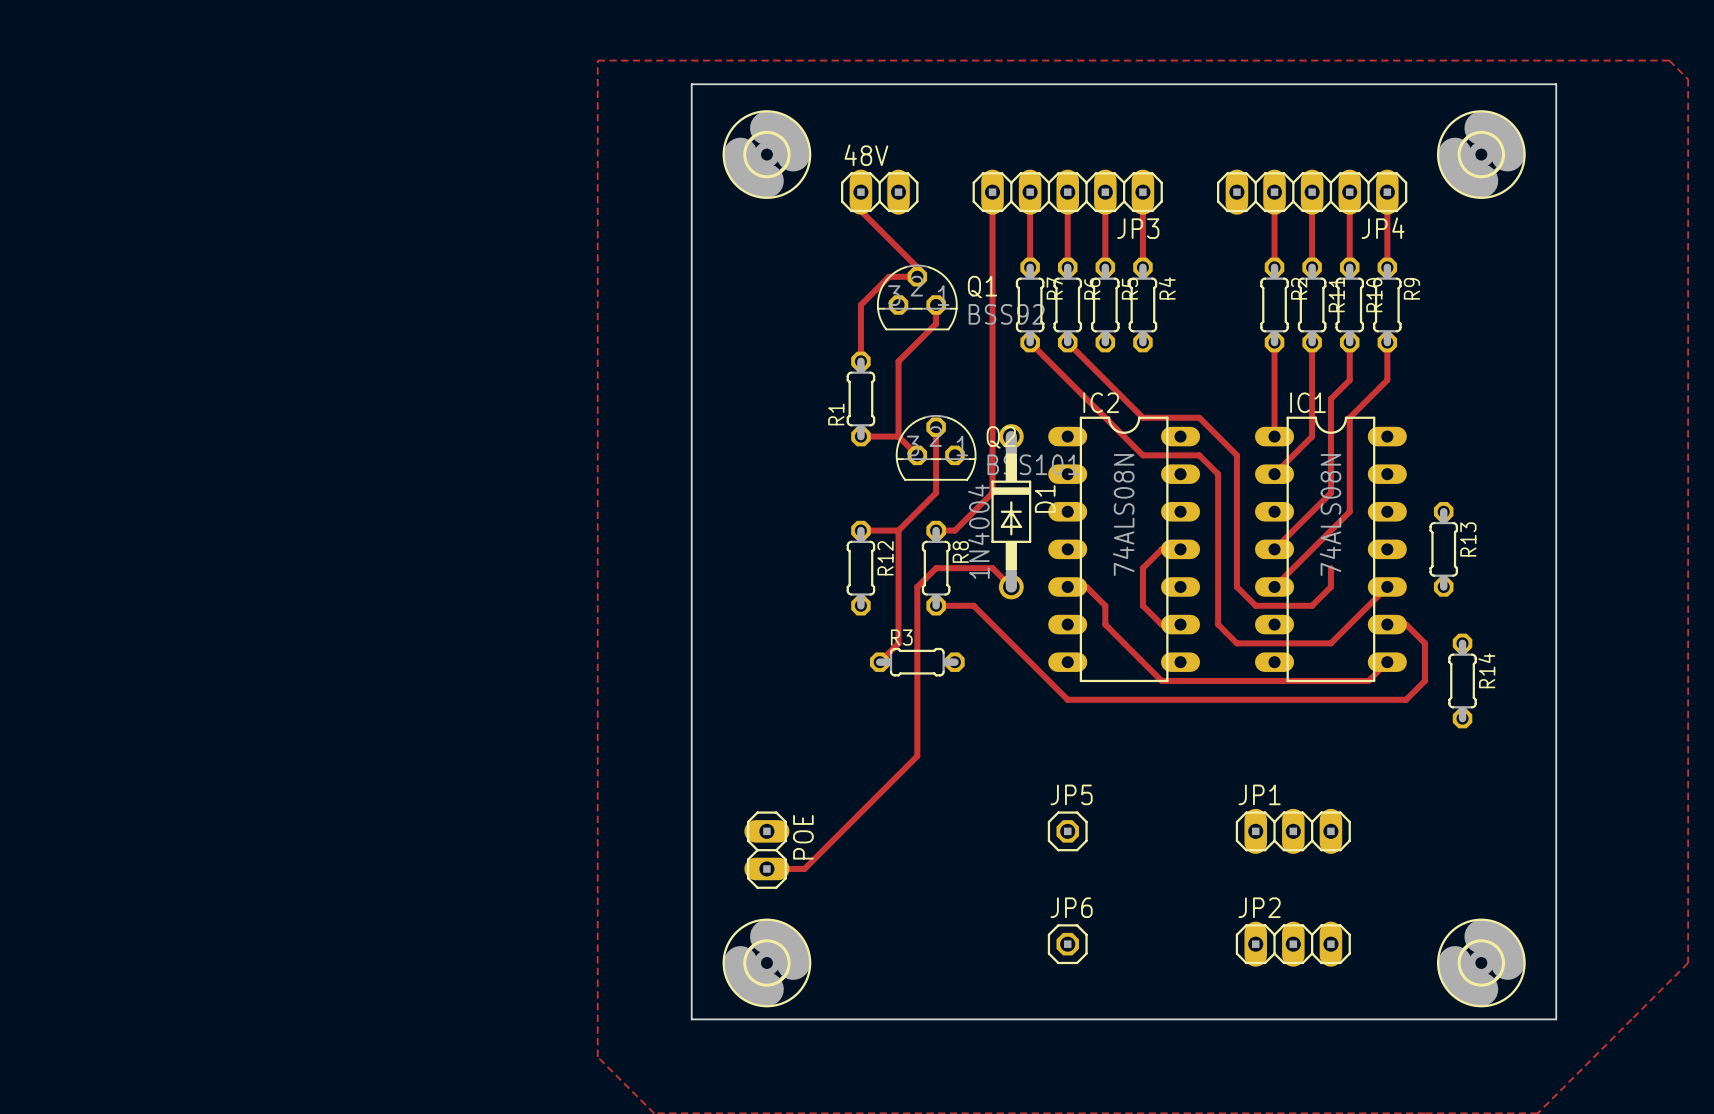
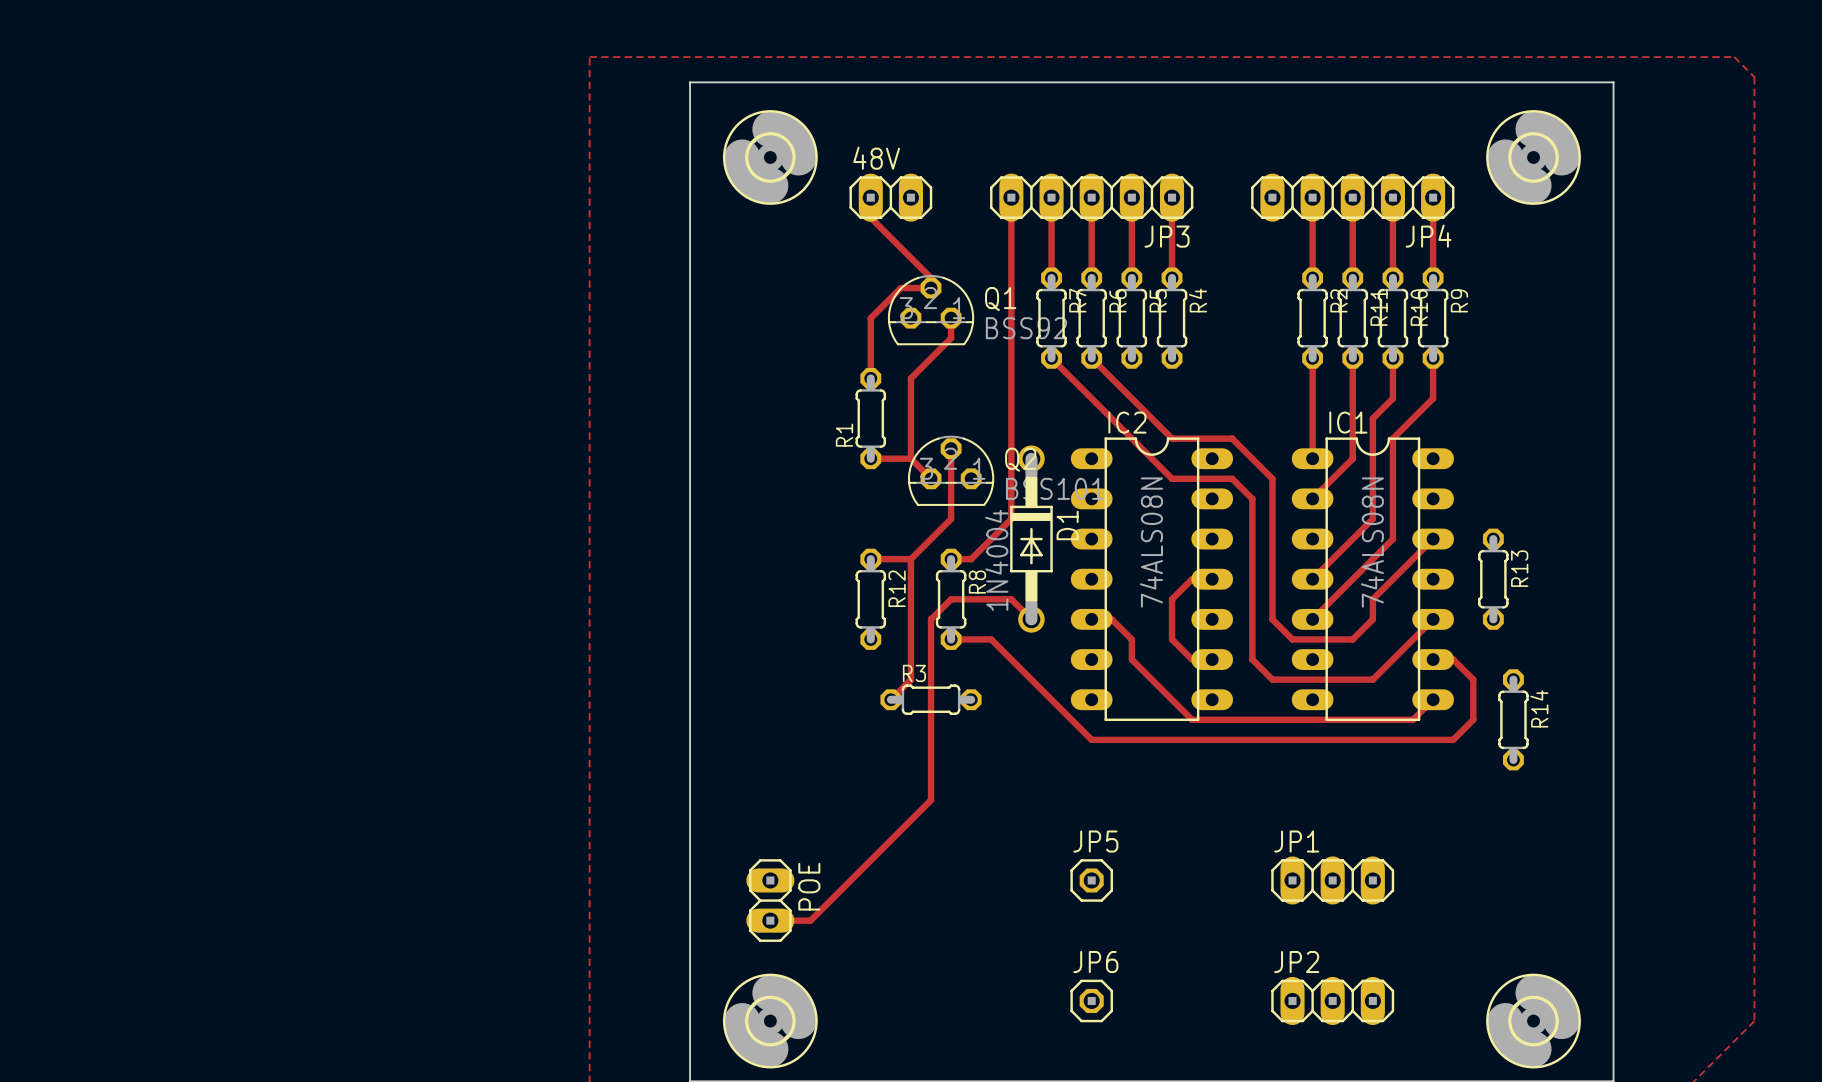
track: none -> (1433, 539) (1372, 599)

